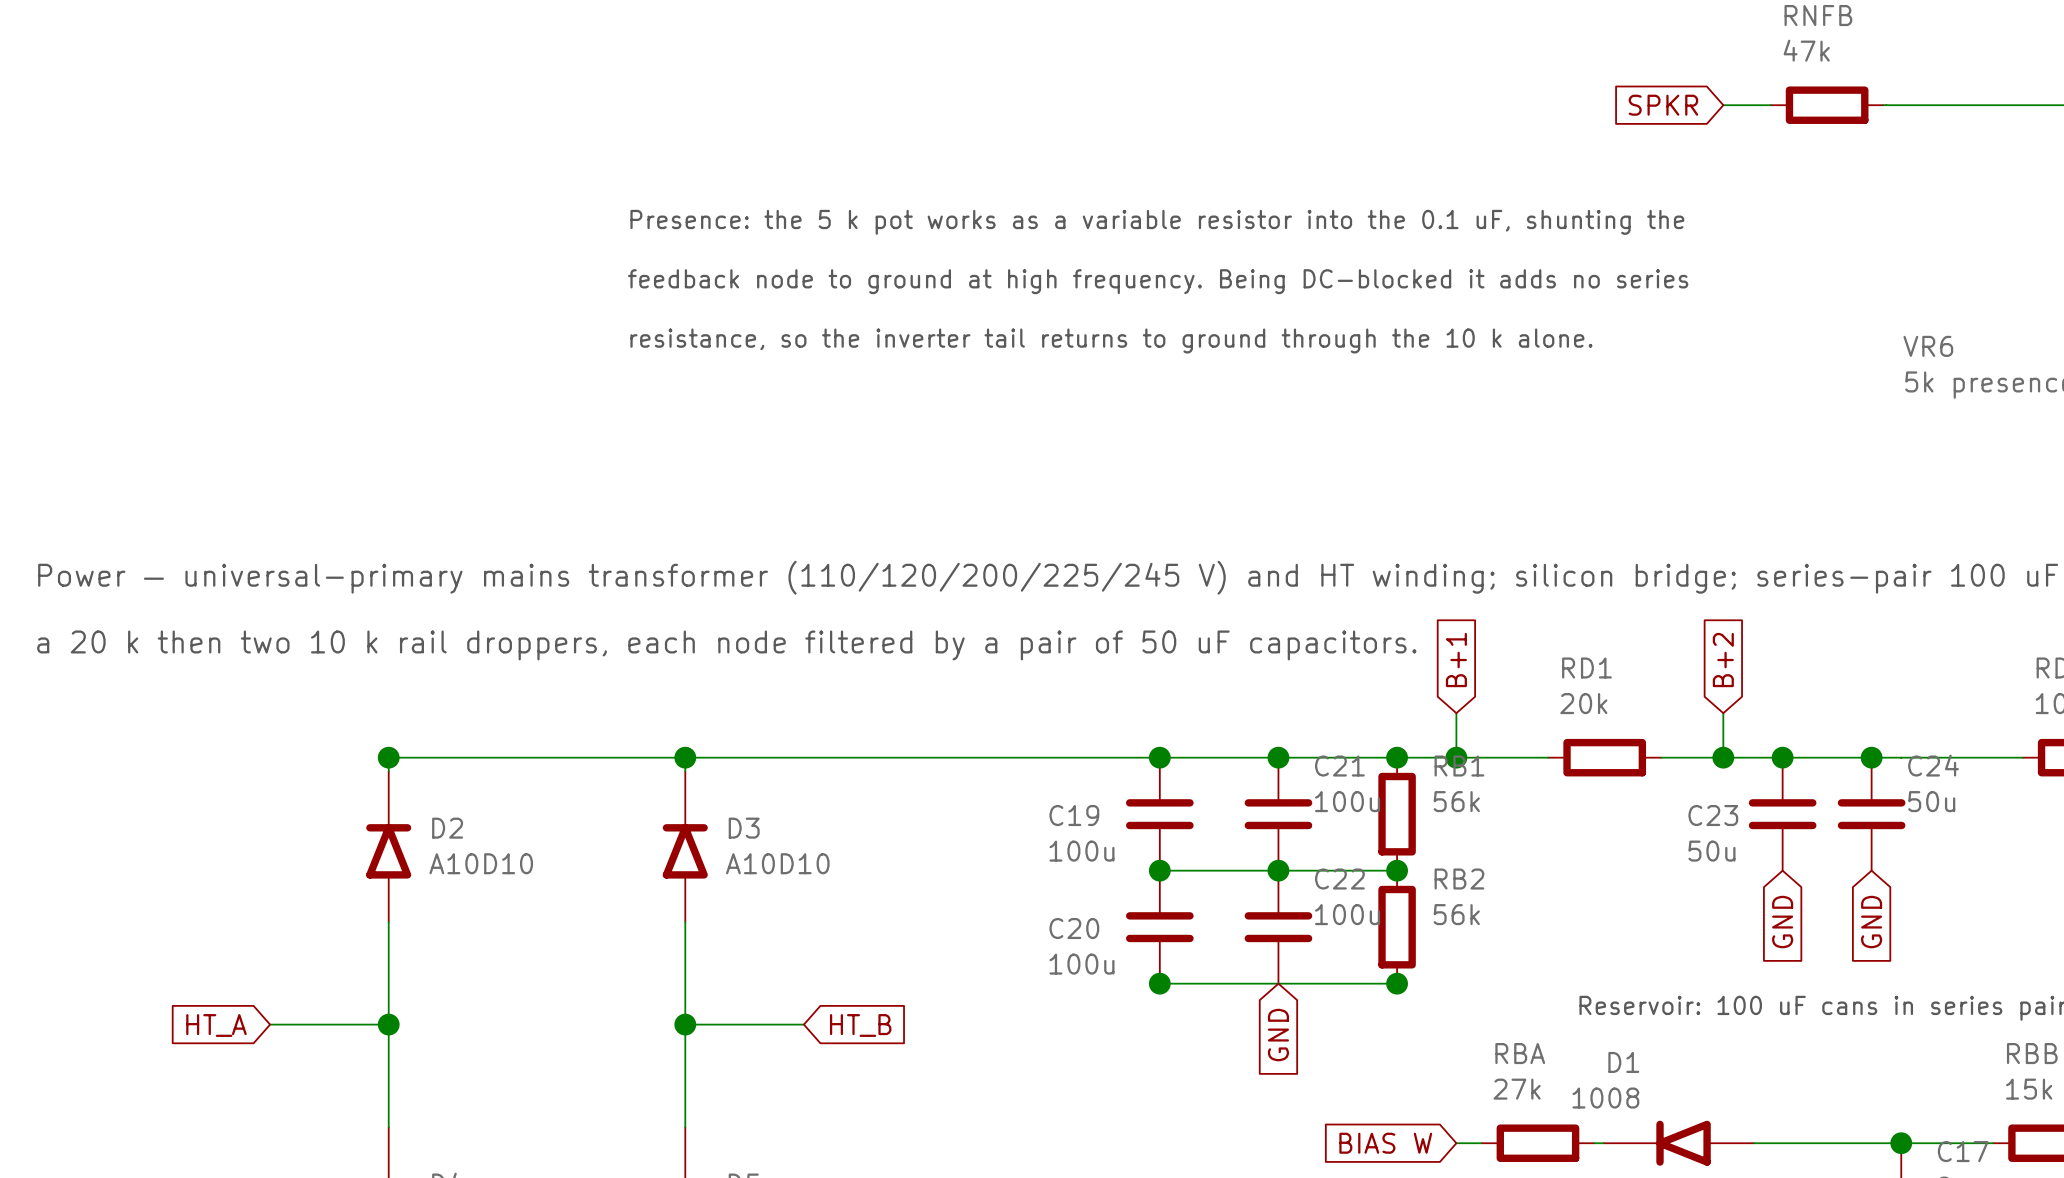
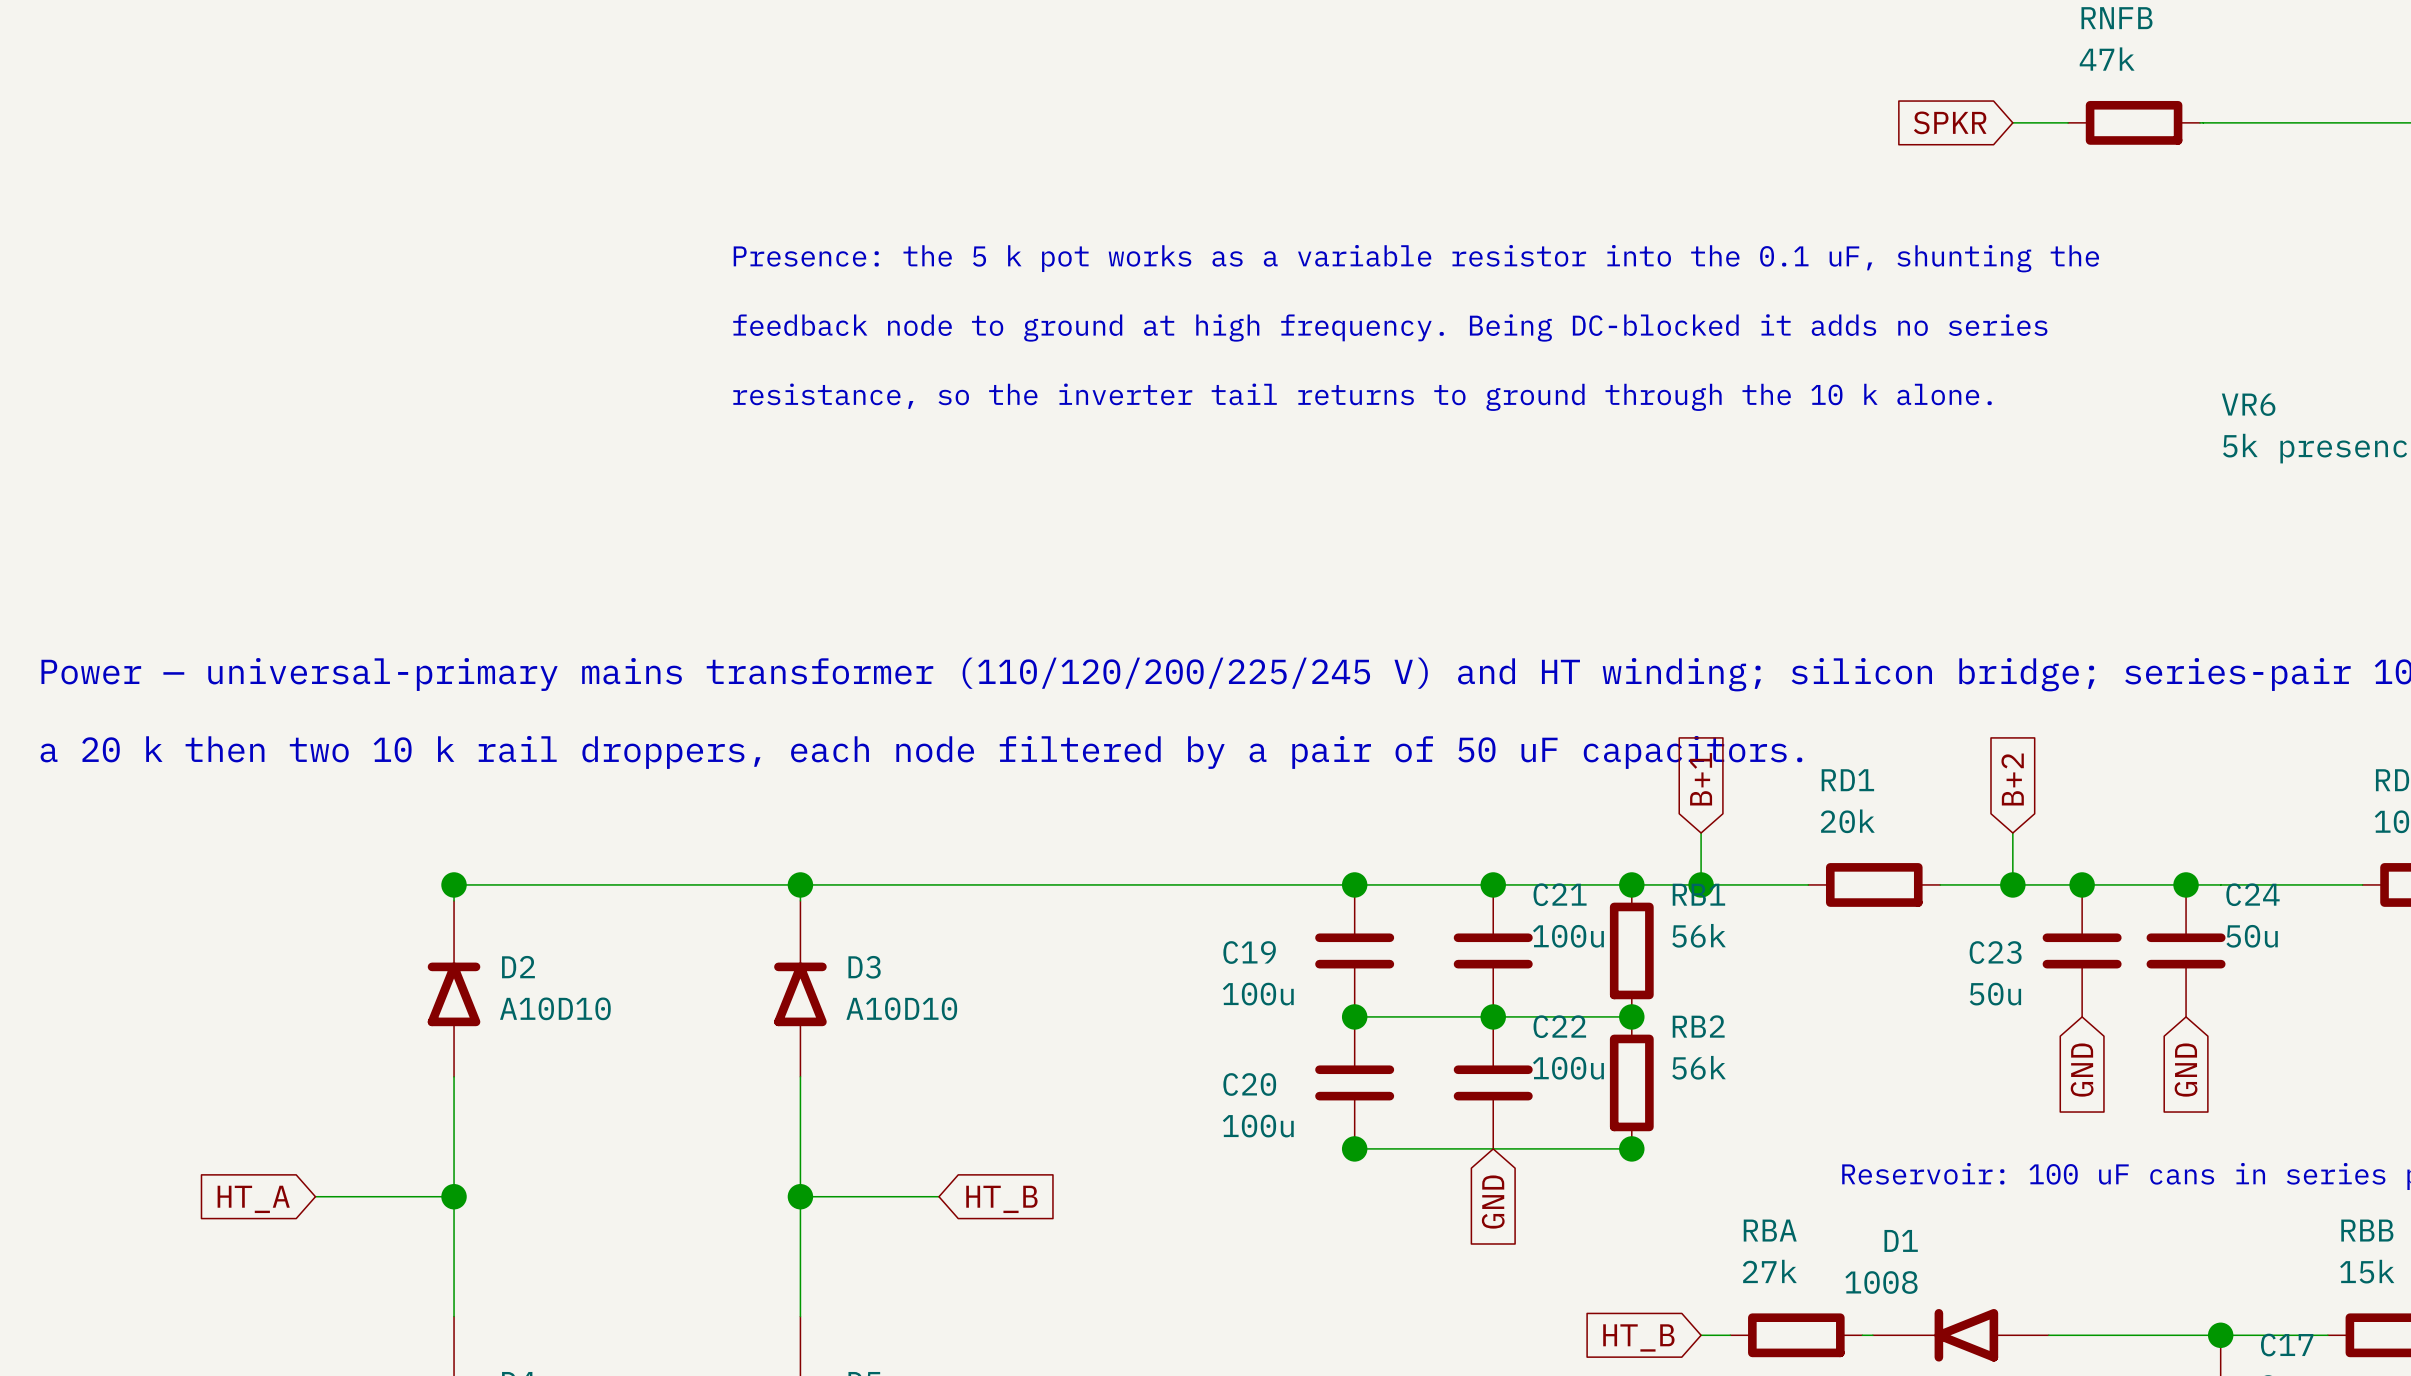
global label: BIAS W (1385, 1143) -> HT_B (1638, 1337)

